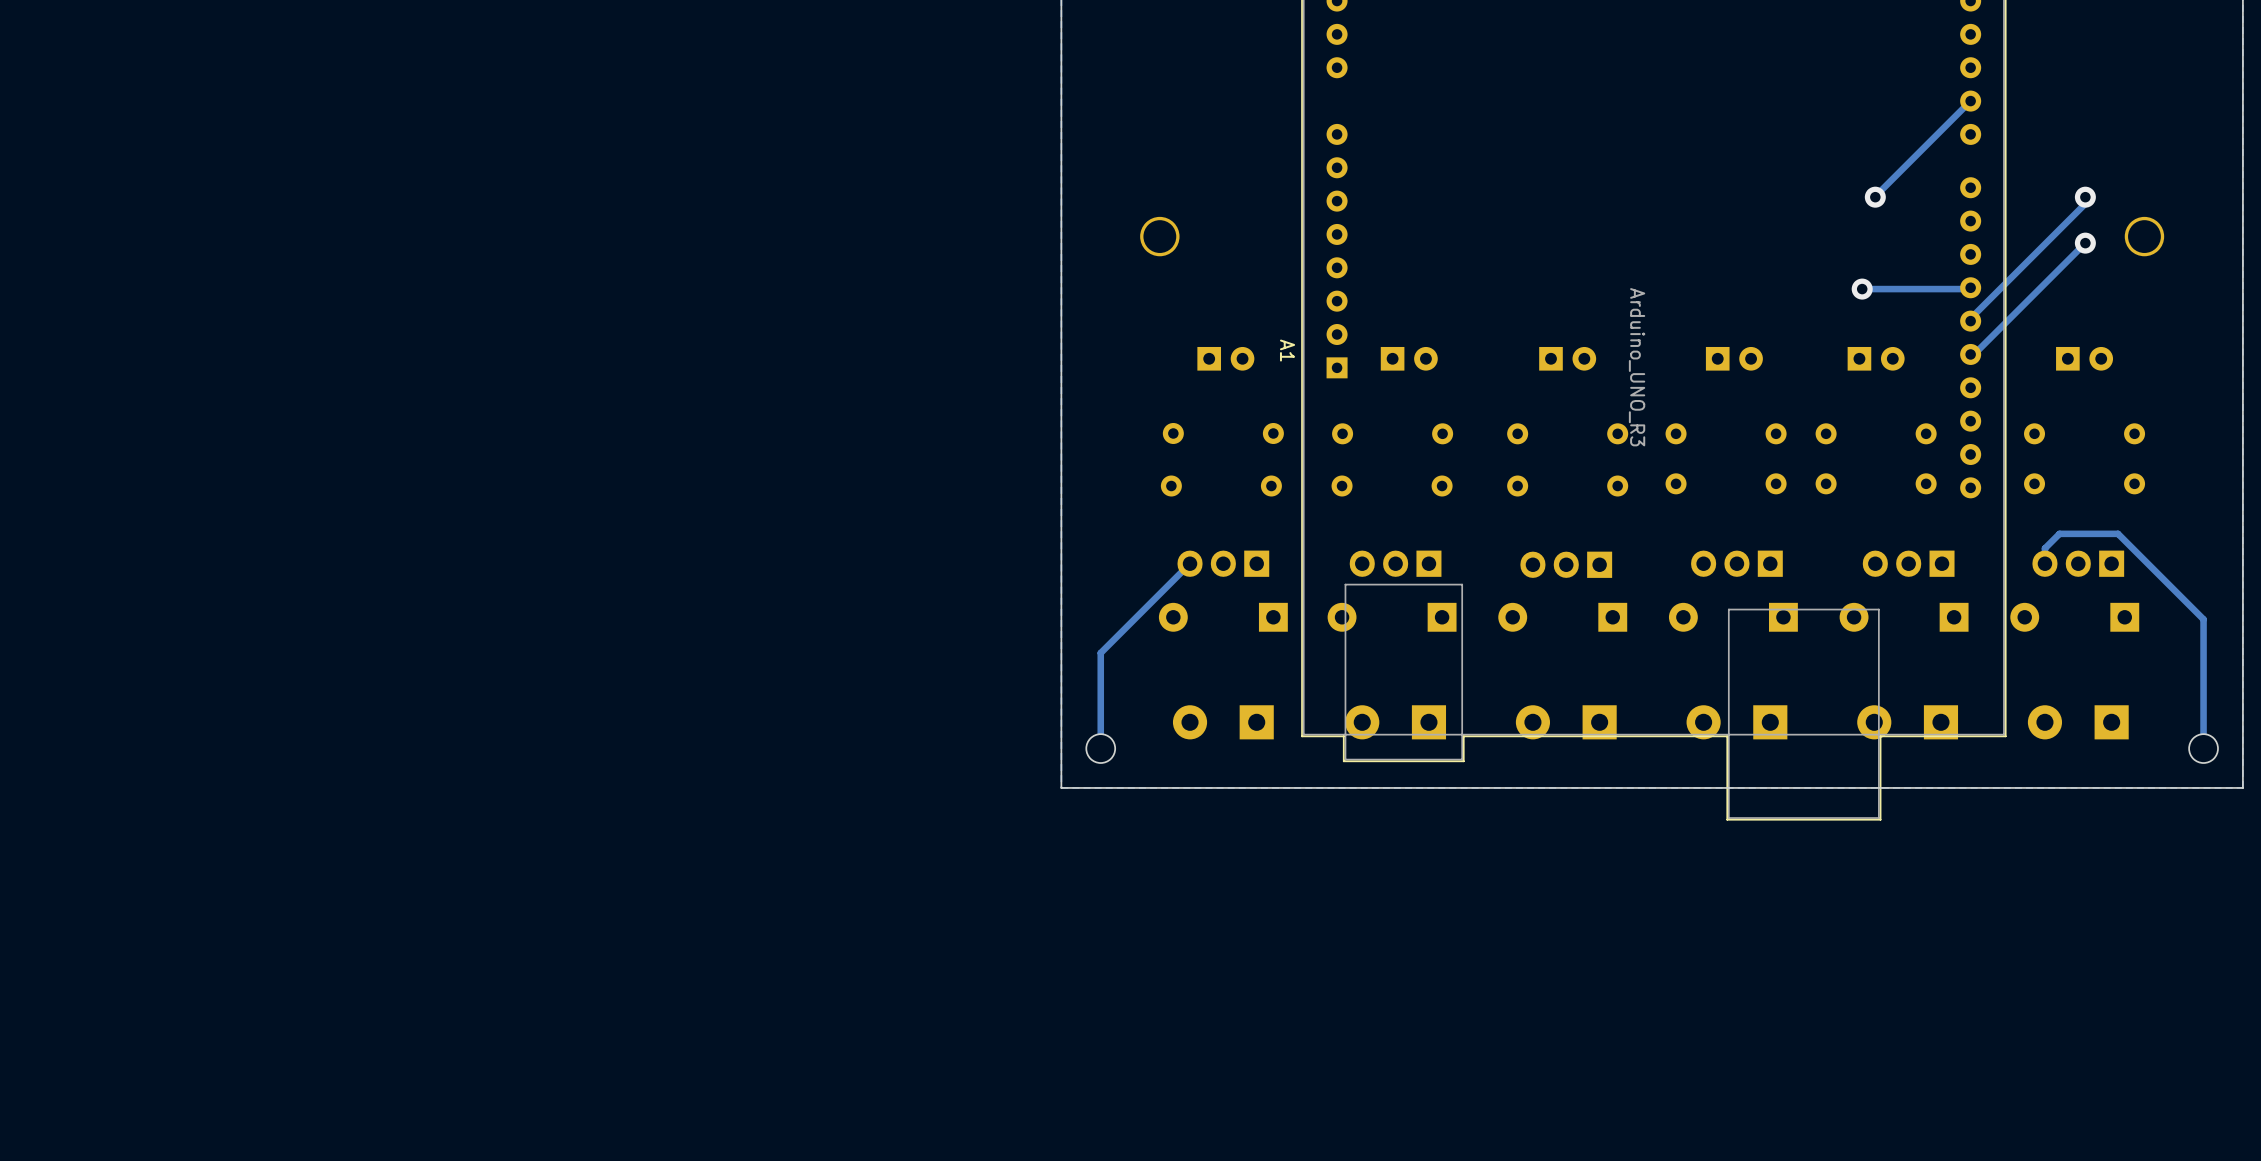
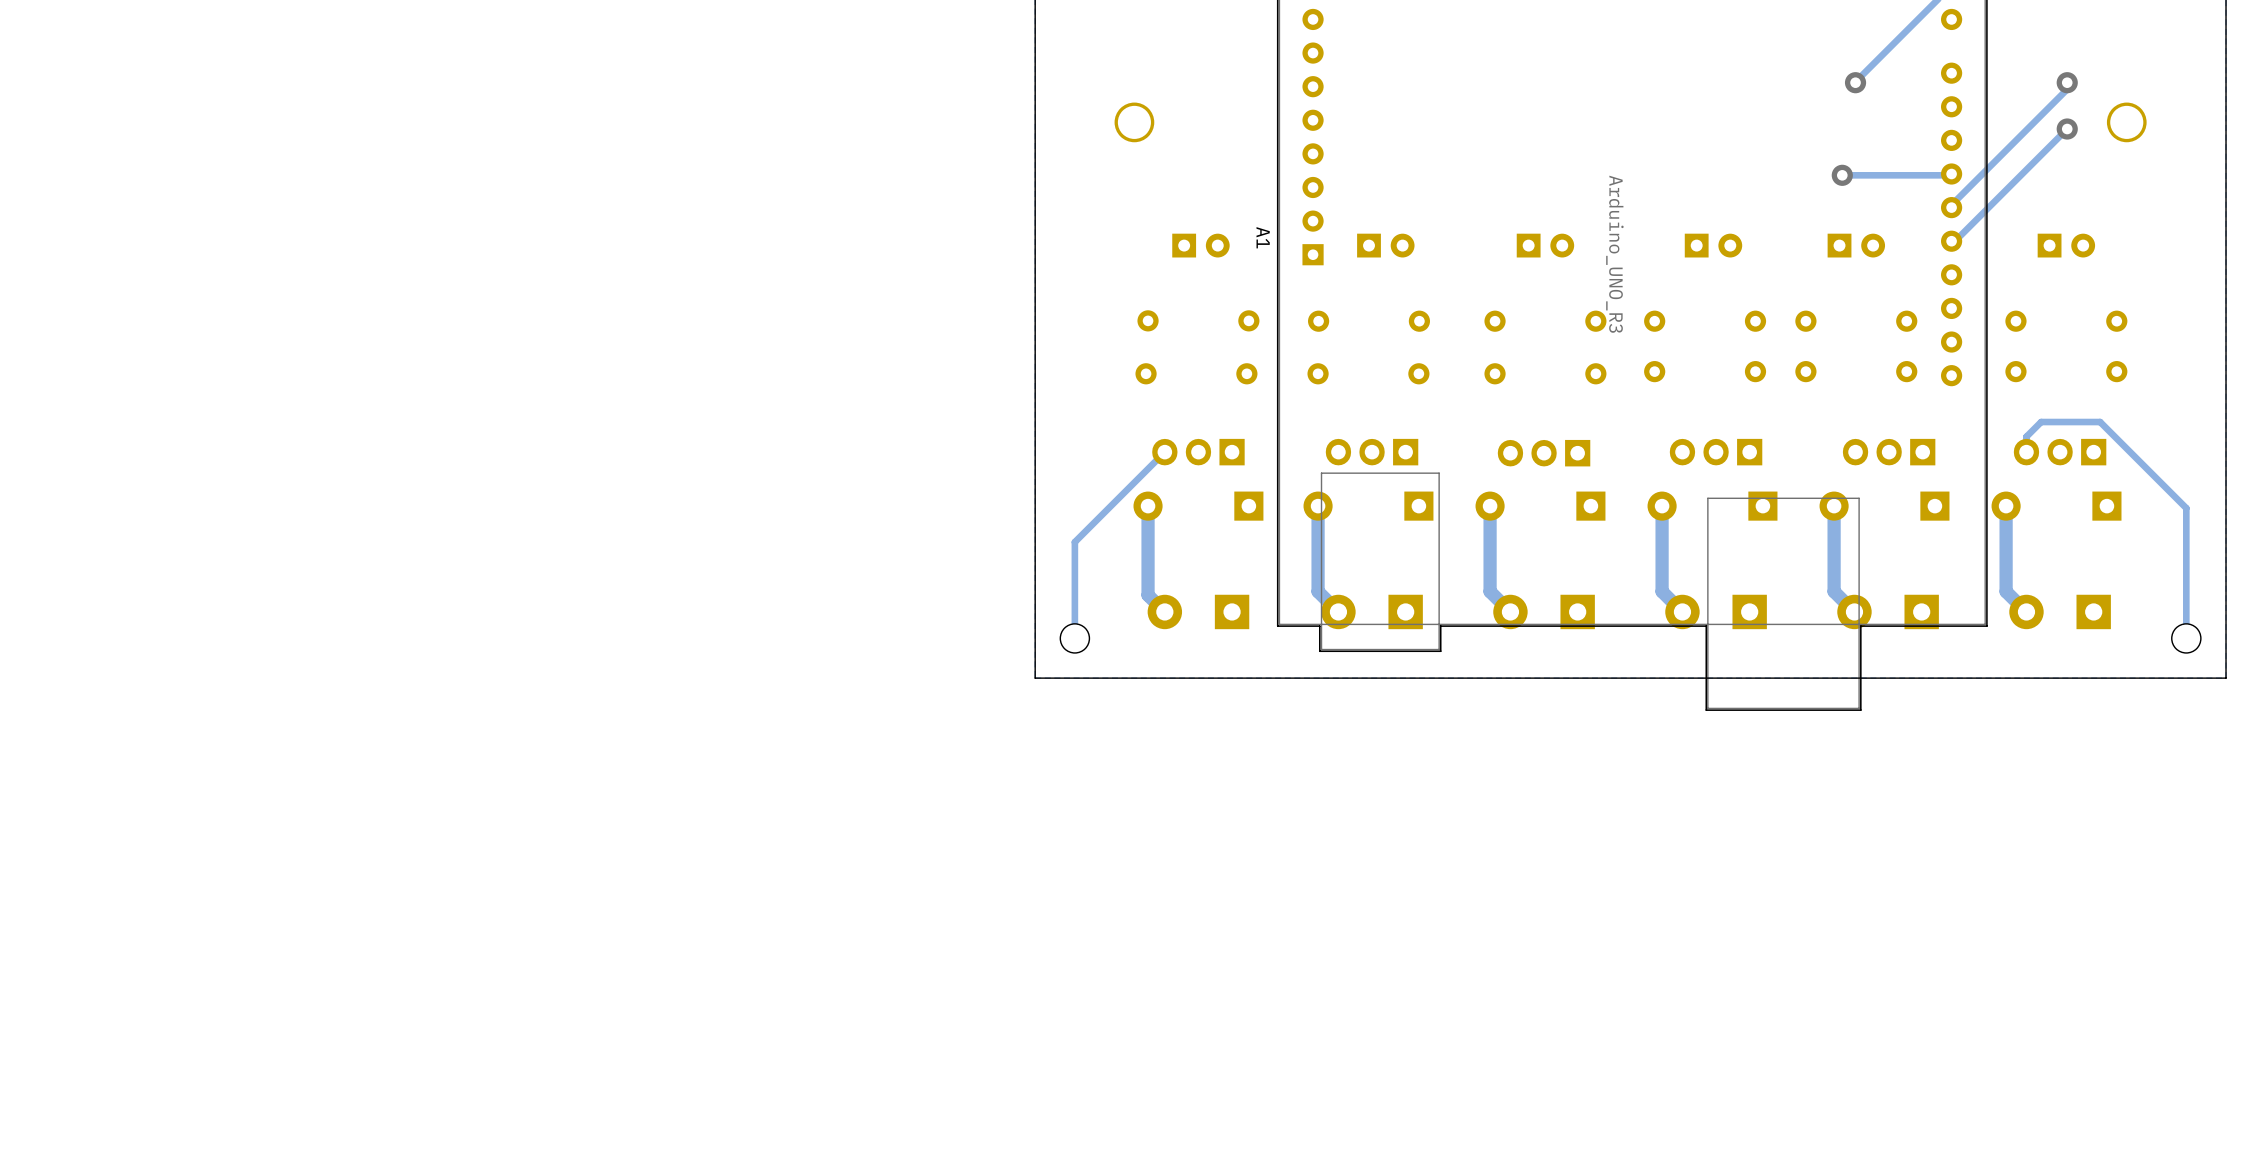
track: none -> (1148, 506) (1148, 595) (1164, 611)
track: none -> (1318, 506) (1318, 591) (1338, 611)
track: none -> (1490, 506) (1490, 591) (1510, 611)
track: none -> (1662, 506) (1662, 591) (1682, 611)
track: none -> (1834, 506) (1834, 591) (1854, 611)
track: none -> (2006, 506) (2006, 591) (2026, 611)

